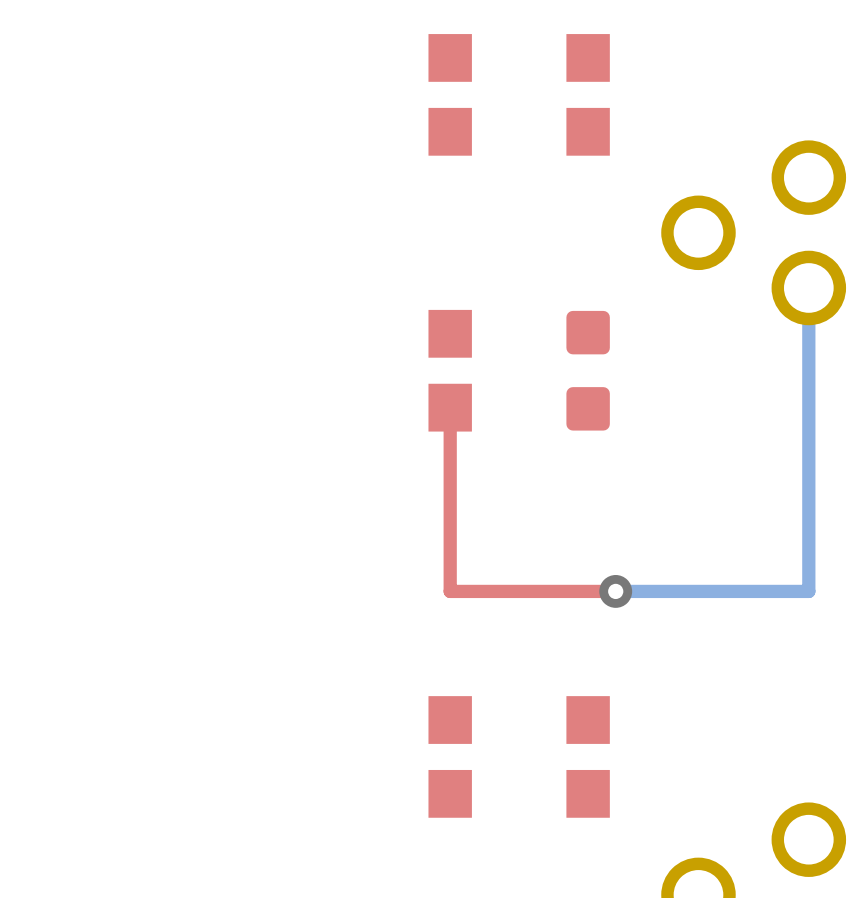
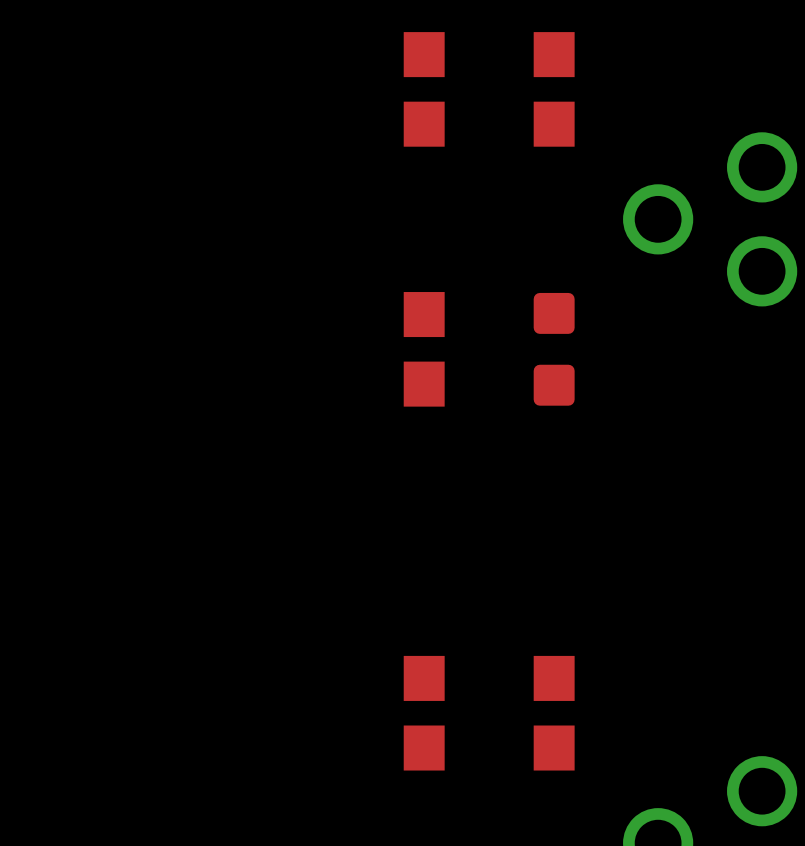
bottom track: (808, 287) (808, 591) (615, 591) -> none
top track: (450, 407) (450, 591) (615, 591) -> none
via: (615, 591) -> none

